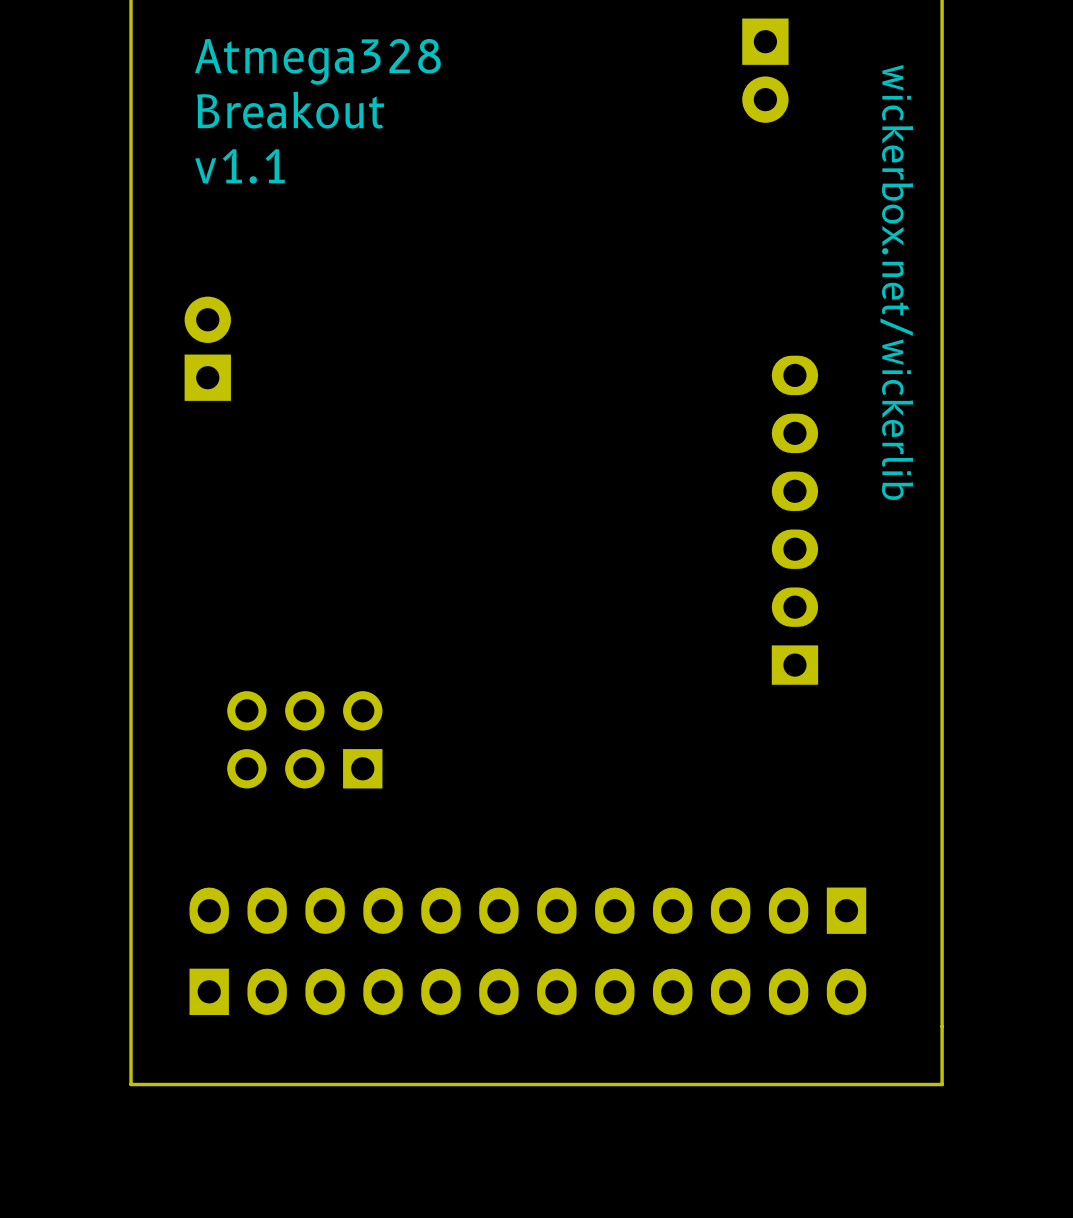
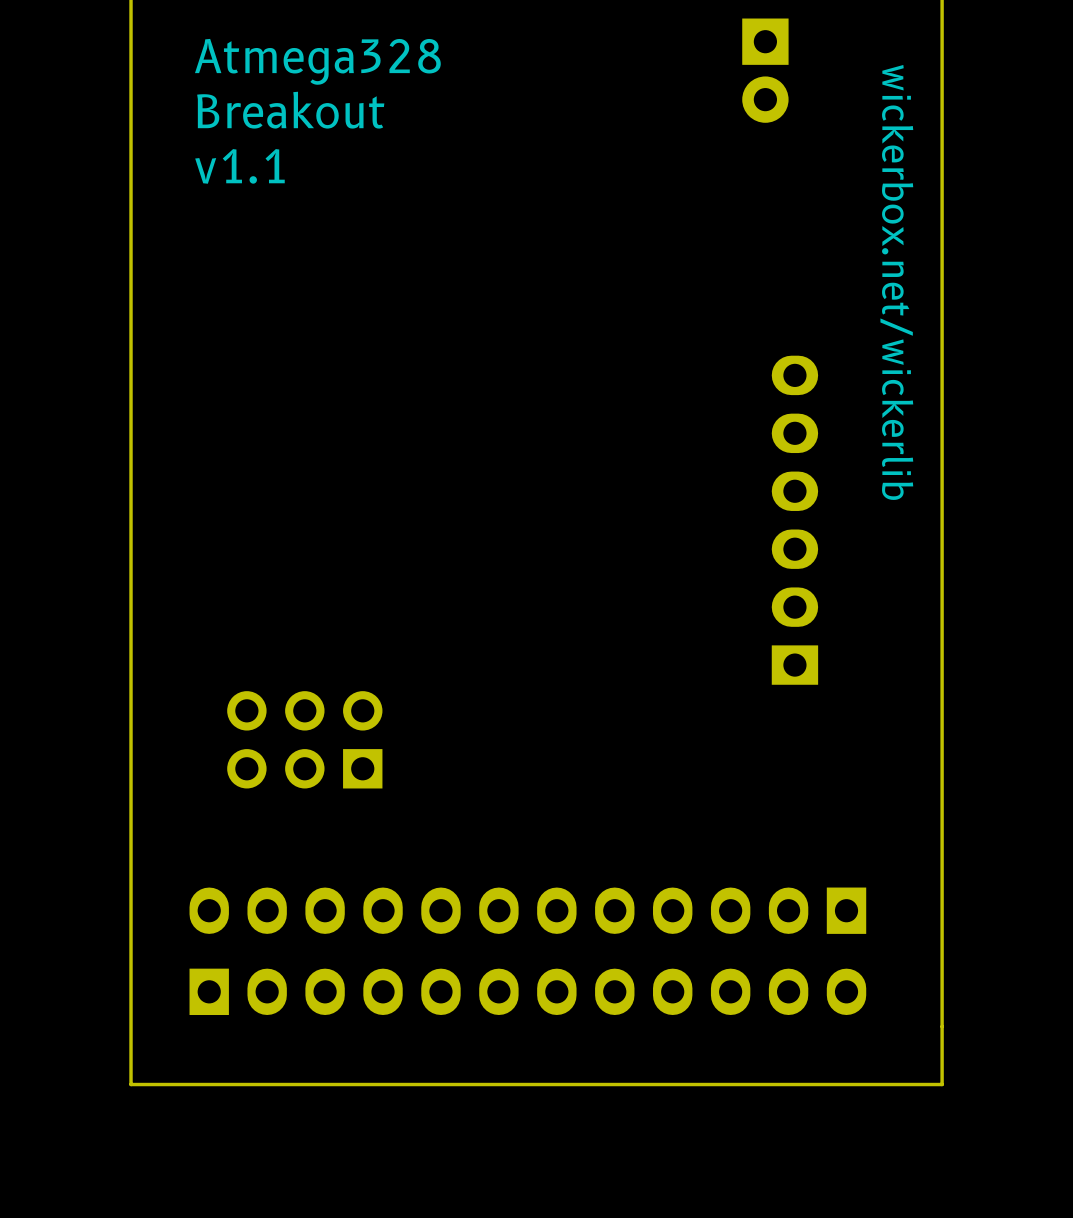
part: (207, 348) -> none

